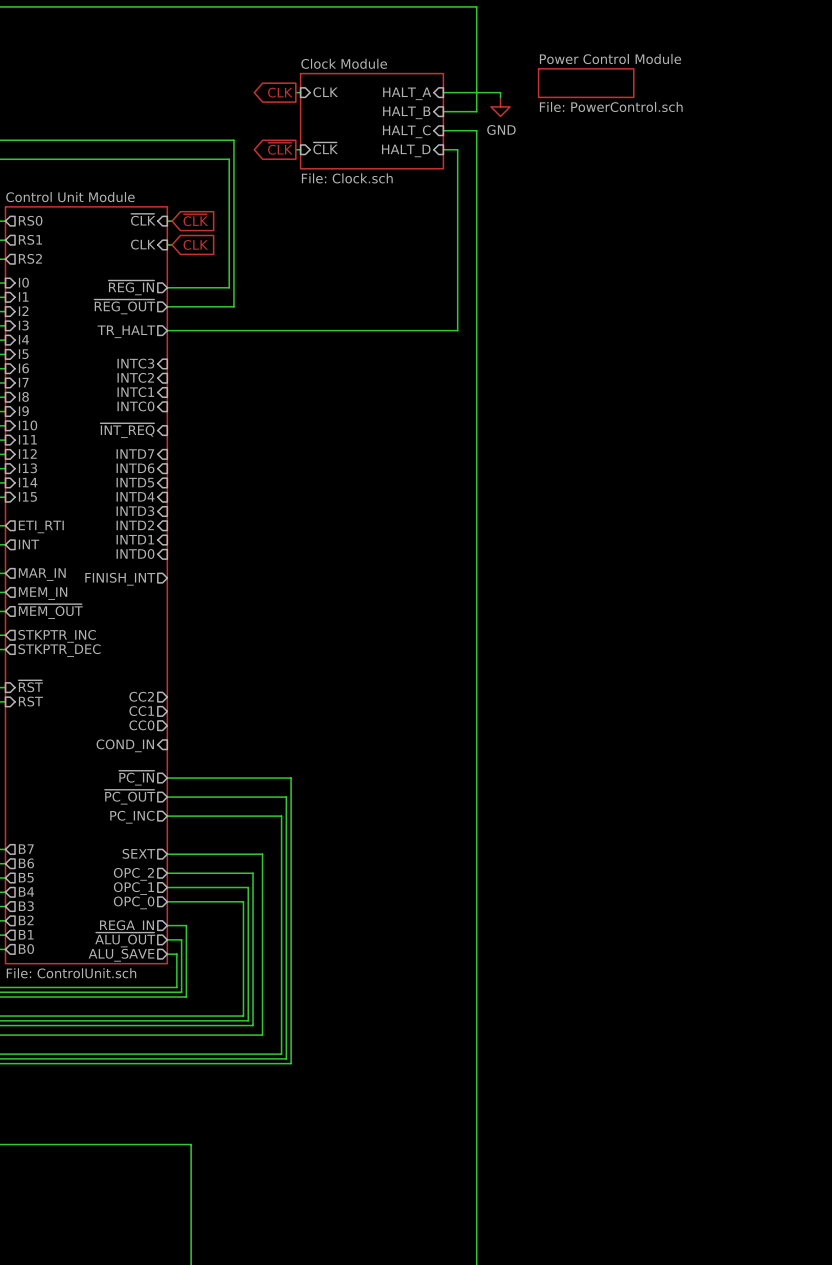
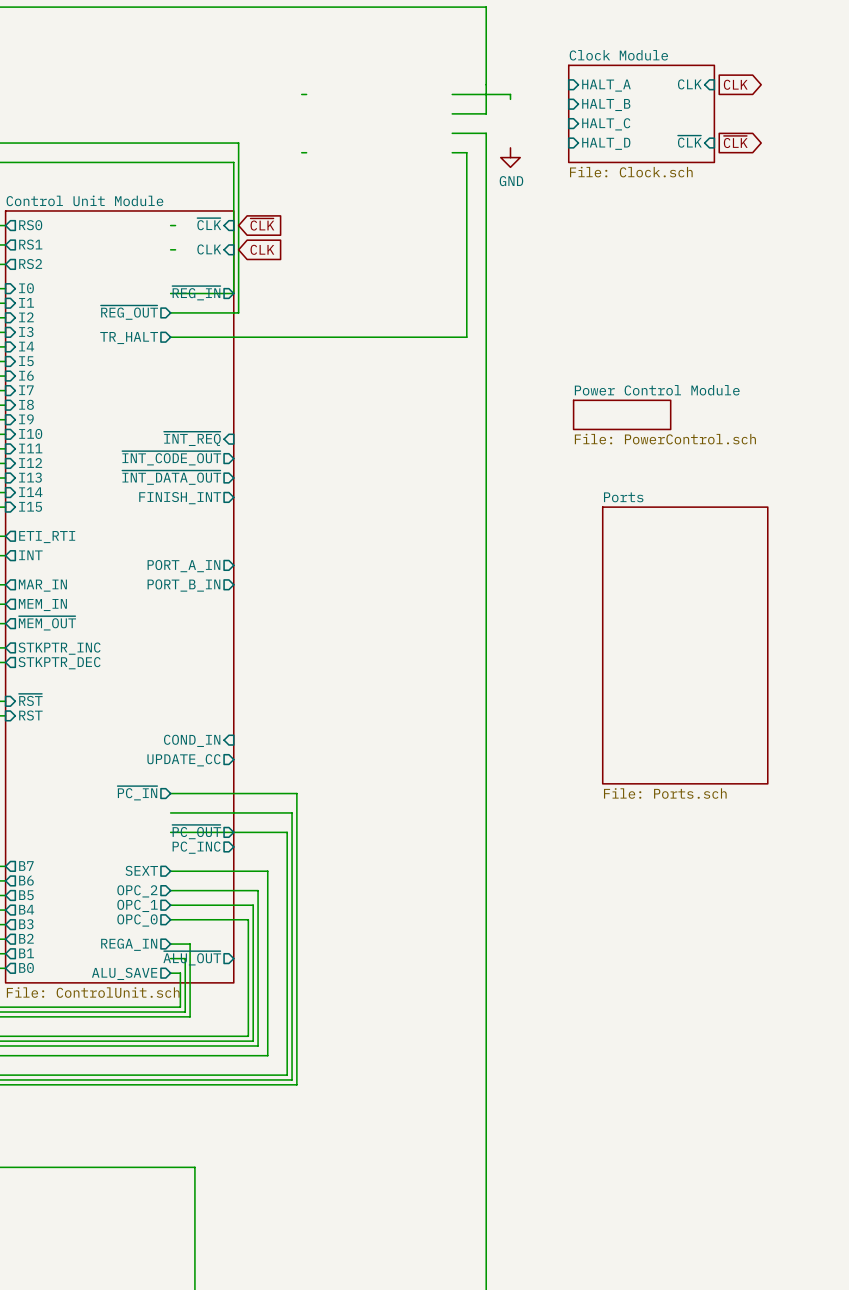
sheet pin: none -> CLK (689, 84)
sheet Power Control Module: File: PowerControl.sch (586, 83) -> none
global label: none -> CLK (735, 84)
global label: CLK (280, 92) -> none
sheet pin: CLK (325, 92) -> none
sheet pin rotation: 0° (407, 93) -> 180° (606, 85)
sheet pin position: HALT_A (407, 93) -> HALT_A (606, 85)
power symbol position: GND (500, 106) -> GND (510, 157)
sheet Clock Module: none -> File: Clock.sch (641, 113)
sheet pin rotation: 0° (406, 112) -> 180° (606, 105)
sheet pin position: HALT_B (406, 112) -> HALT_B (606, 105)
sheet Clock Module: File: Clock.sch (372, 121) -> none
sheet pin rotation: 0° (406, 131) -> 180° (606, 124)
sheet pin position: HALT_C (406, 131) -> HALT_C (606, 124)
sheet pin: none -> ~{CLK} (689, 141)
global label: none -> ~{CLK} (735, 141)
global label: ~{CLK} (280, 148) -> none
sheet pin: ~{CLK} (325, 148) -> none
sheet pin rotation: 0° (406, 150) -> 180° (606, 143)
sheet pin position: HALT_D (406, 150) -> HALT_D (606, 143)
sheet pin: ~{CLK} (143, 219) -> none
sheet pin: none -> ~{CLK} (209, 224)
global label position: ~{CLK} (195, 220) -> ~{CLK} (262, 224)
sheet pin position: CLK (143, 244) -> CLK (209, 249)
global label position: CLK (195, 244) -> CLK (262, 249)
sheet pin position: ~{REG_IN} (131, 287) -> ~{REG_IN} (196, 293)
sheet pin: INTC3 (135, 363) -> none
sheet pin: INTC2 (135, 377) -> none
sheet pin: INTC1 (135, 392) -> none
sheet pin: INTC0 (135, 406) -> none
sheet Power Control Module: none -> File: PowerControl.sch (622, 414)
sheet pin position: ~{INT_REQ} (127, 430) -> ~{INT_REQ} (192, 438)
sheet pin: none -> ~{INT_CODE_OUT} (171, 458)
sheet pin: INTD7 (135, 454) -> none
sheet pin: INTD6 (135, 468) -> none
sheet pin: none -> ~{INT_DATA_OUT} (171, 477)
sheet pin: INTD5 (135, 482) -> none
sheet pin: INTD4 (135, 496) -> none
sheet pin: INTD3 (135, 511) -> none
sheet pin: INTD2 (135, 525) -> none
sheet pin: INTD1 (135, 539) -> none
sheet pin: INTD0 (135, 553) -> none
sheet pin: none -> PORT_A_IN (183, 566)
sheet pin: none -> PORT_B_IN (183, 585)
sheet pin position: FINISH_INT (120, 579) -> FINISH_INT (180, 498)
sheet Control Unit Module: File: ControlUnit.sch (86, 585) -> none
sheet Control Unit Module: none -> File: ControlUnit.sch (119, 596)
sheet Ports: none -> File: Ports.sch (685, 645)
sheet pin: CC2 (141, 696) -> none
sheet pin: CC1 (141, 711) -> none
sheet pin: CC0 (141, 725) -> none
sheet pin position: COND_IN (125, 745) -> COND_IN (192, 740)
sheet pin: none -> UPDATE_CC (184, 760)
sheet pin position: ~{PC_OUT} (130, 797) -> ~{PC_OUT} (196, 832)
sheet pin position: PC_INC (132, 817) -> PC_INC (196, 847)
sheet pin position: ~{ALU_OUT} (125, 939) -> ~{ALU_OUT} (192, 958)

